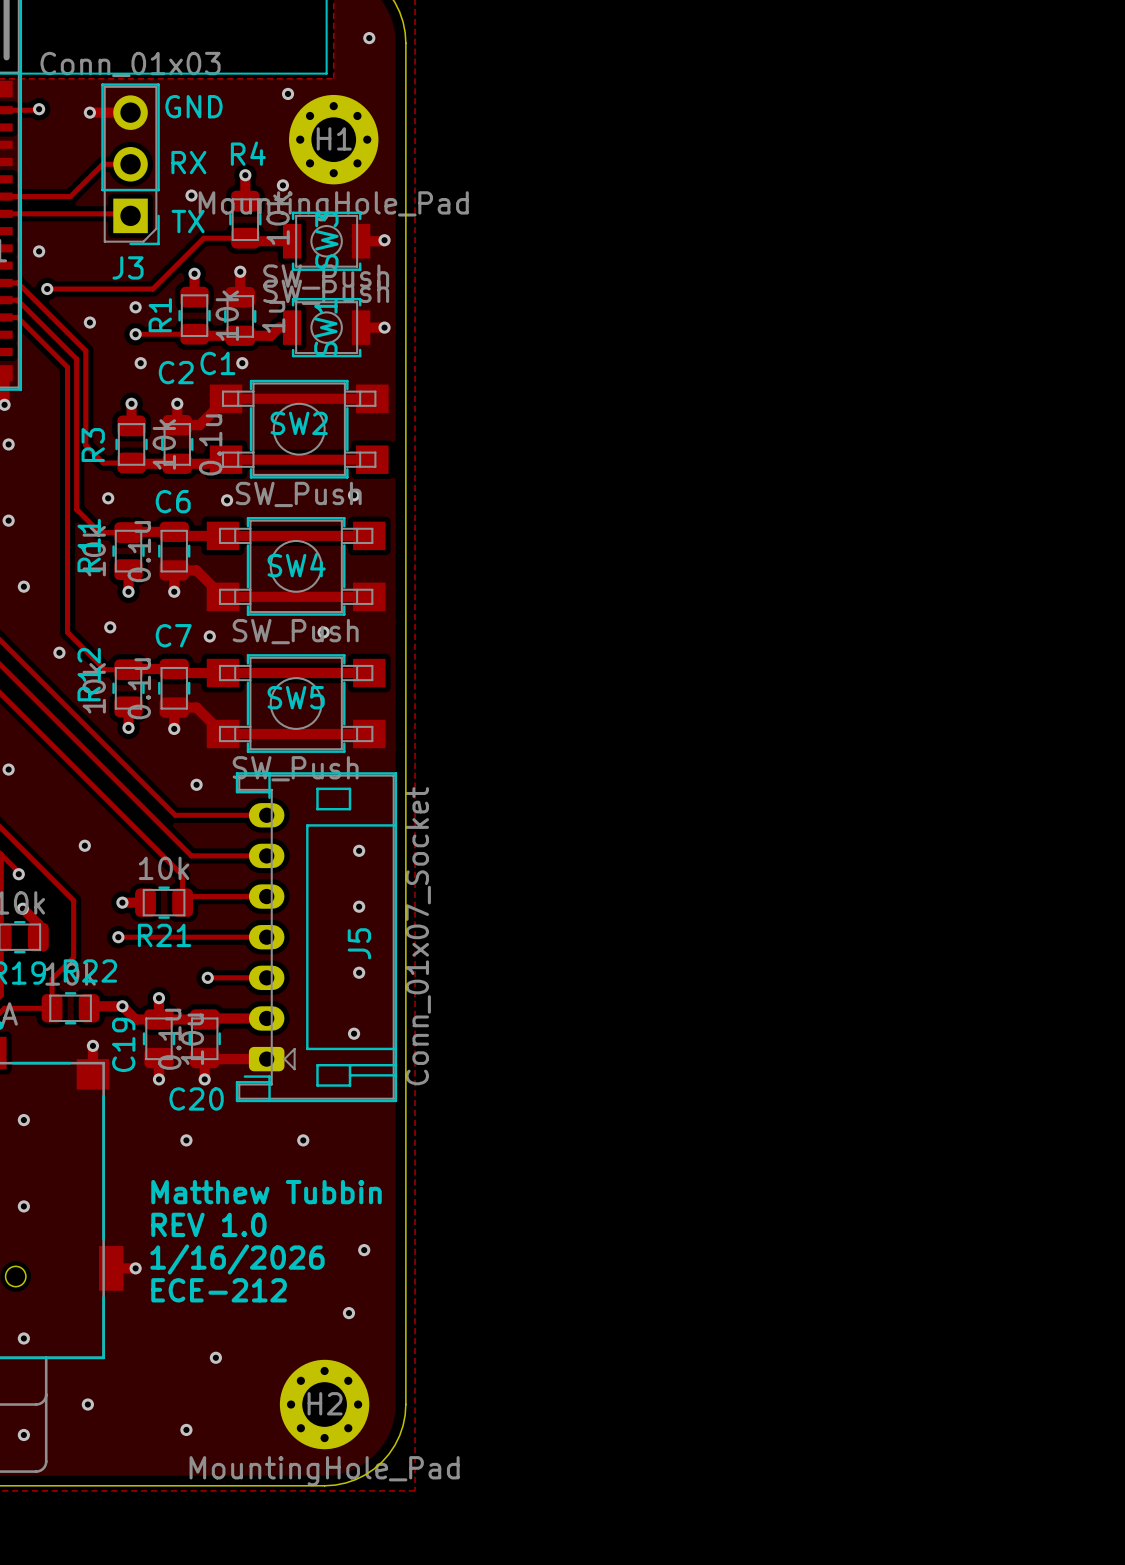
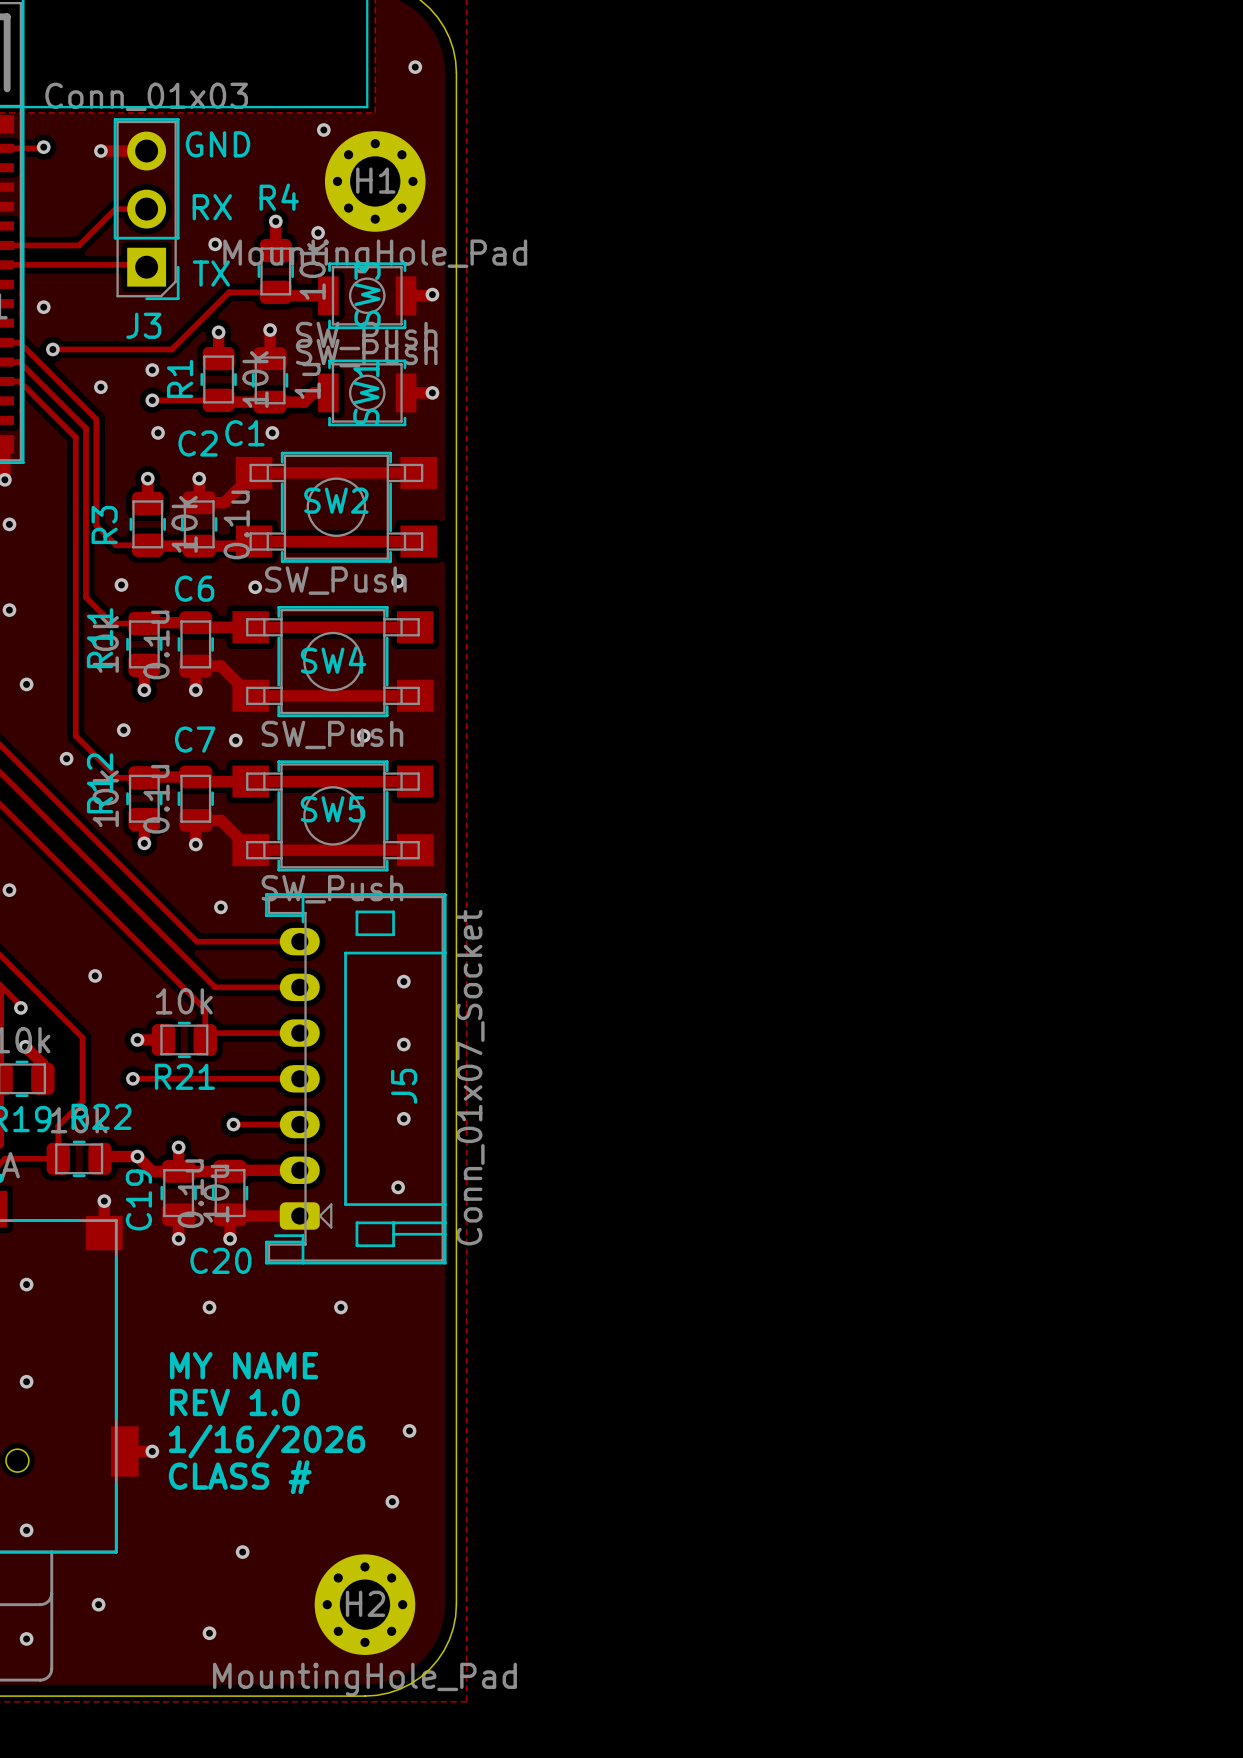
text: Matthew Tubbin (266, 1192) -> MY NAME (244, 1365)
text: ECE-212 (219, 1290) -> CLASS # (240, 1477)

